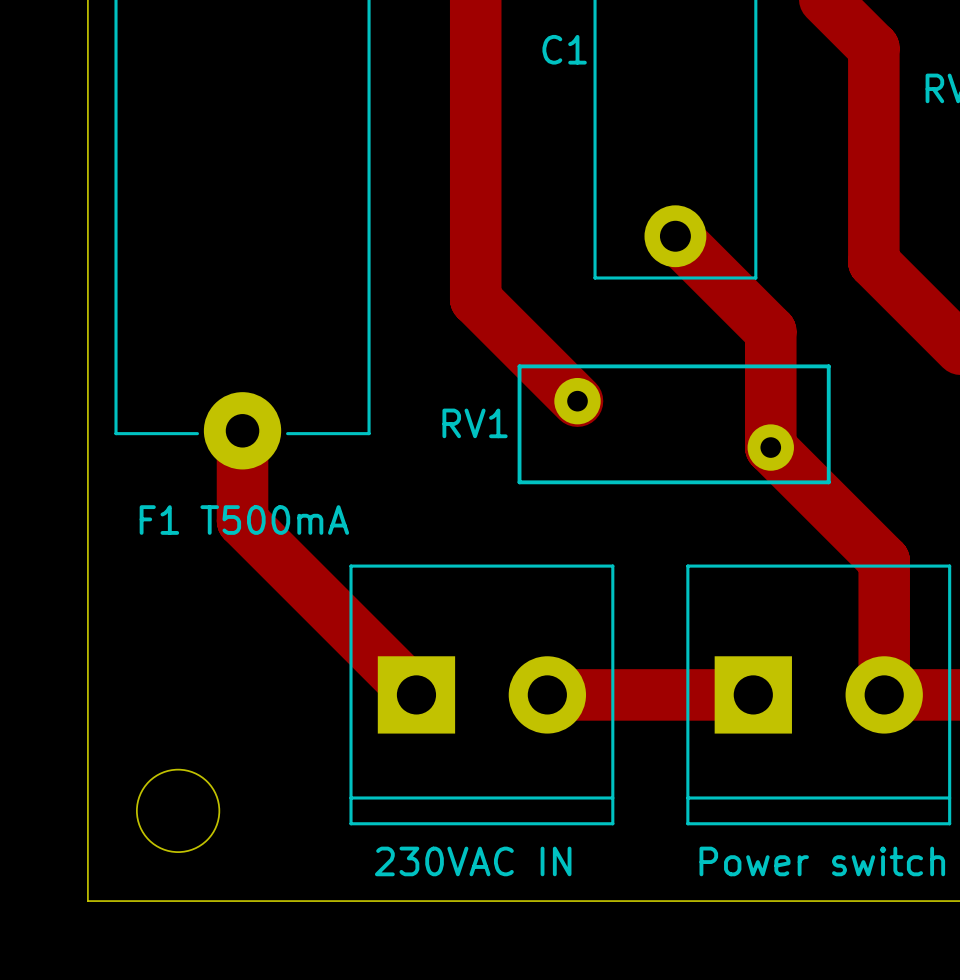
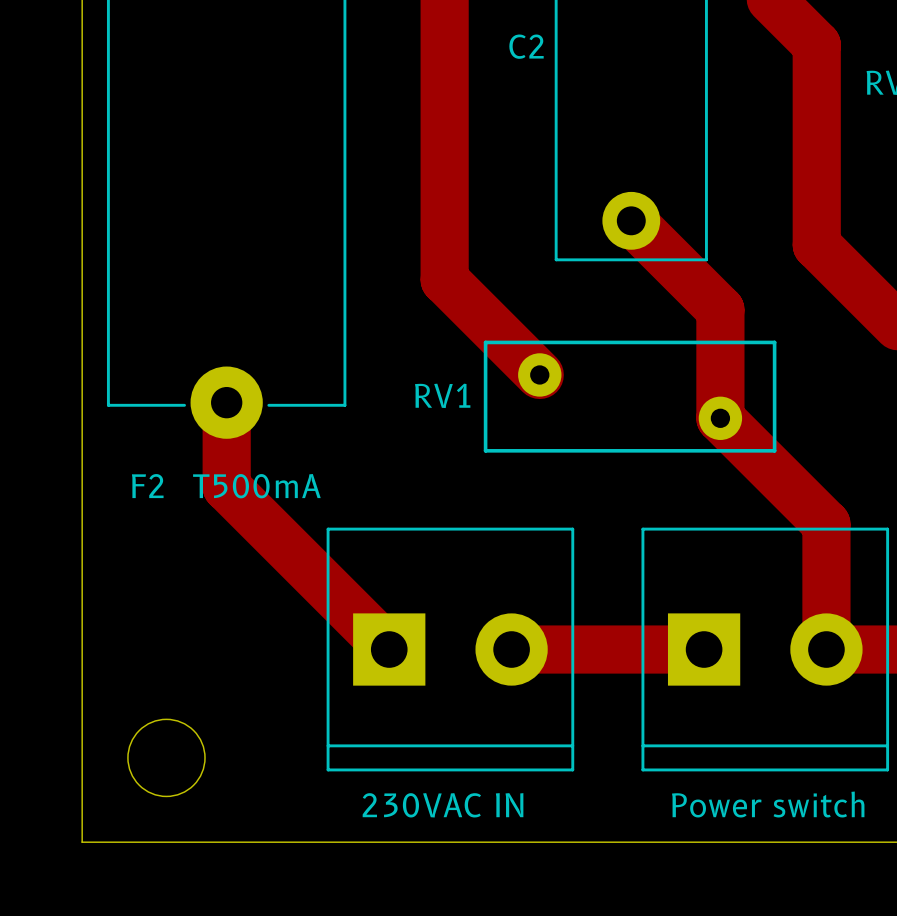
C1 name: C1 (564, 49) -> C2 (526, 46)
F1 name: F1 (159, 520) -> F2 (147, 486)

